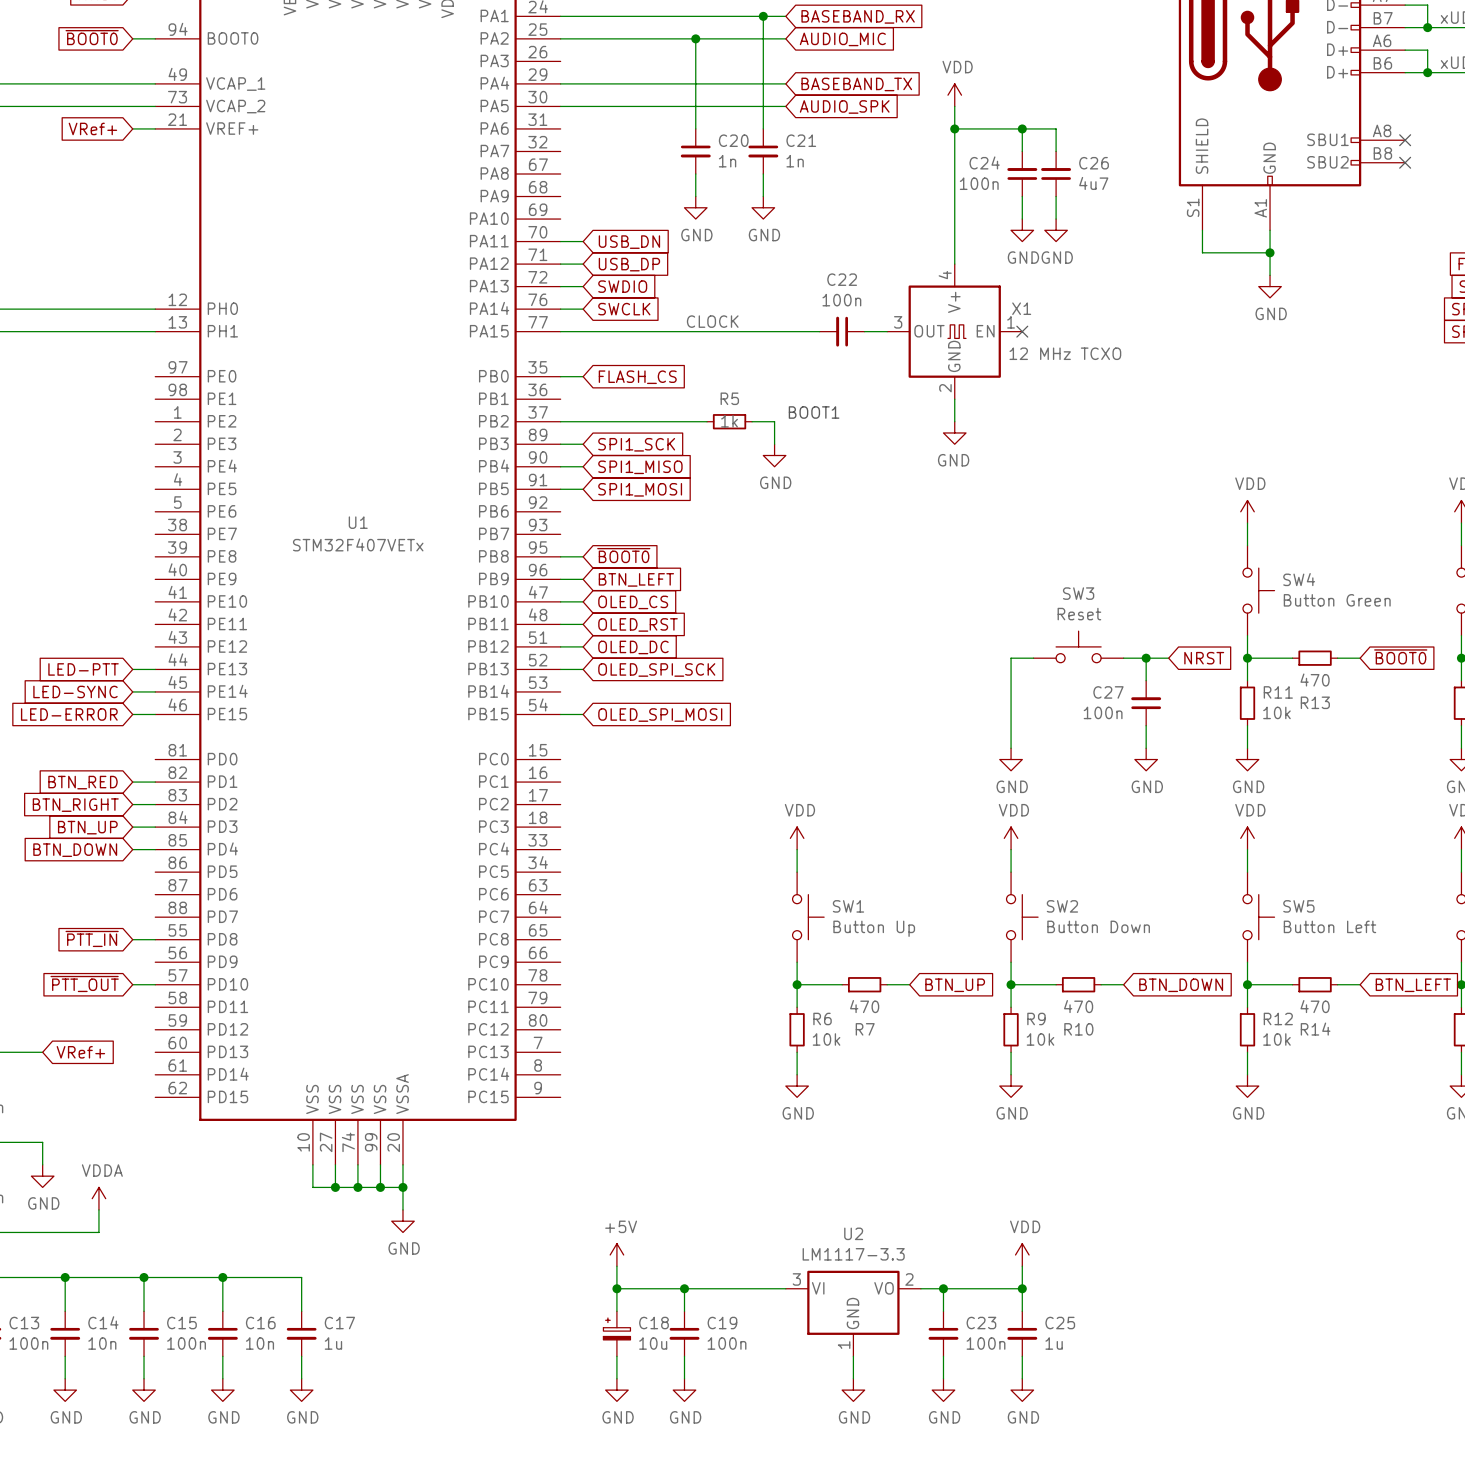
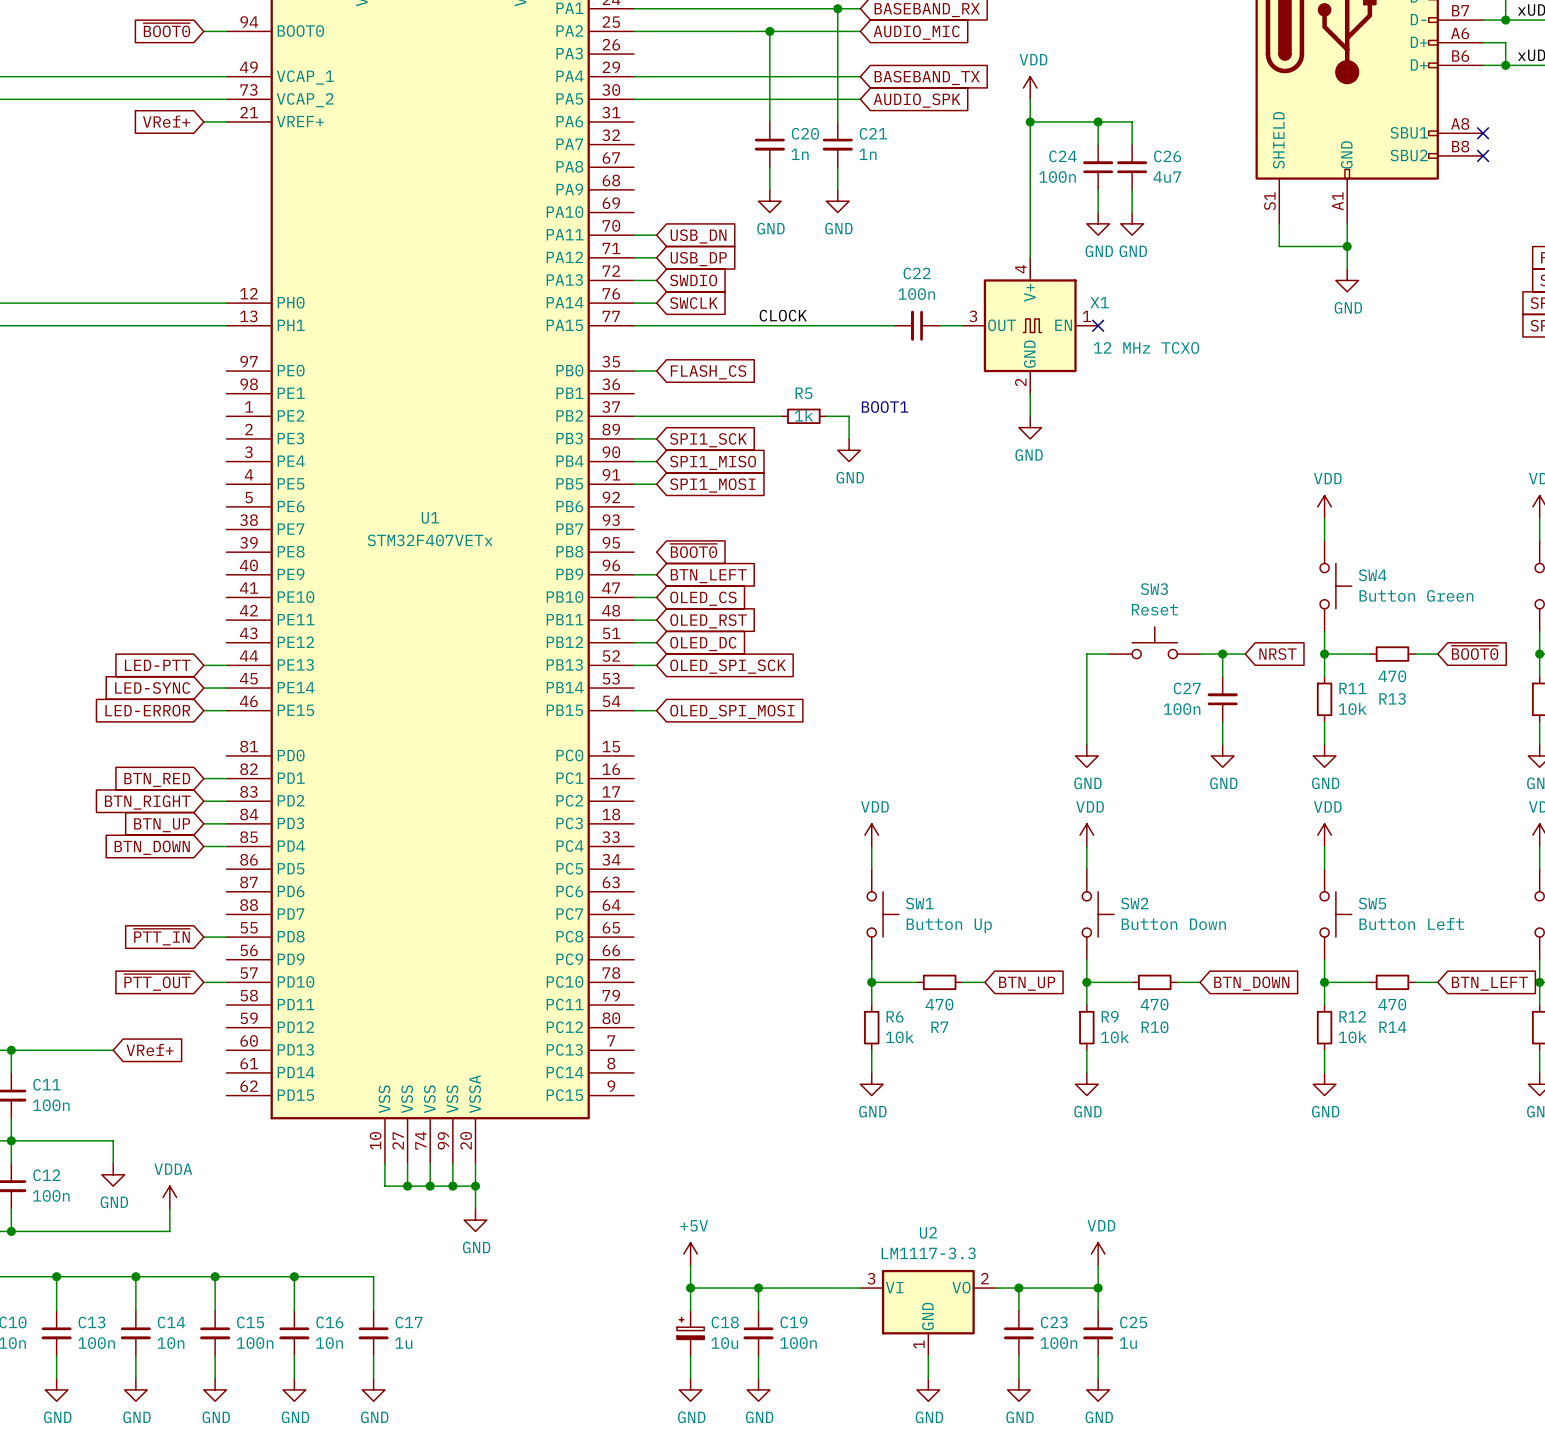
wire: (560, 556) (583, 556) -> none

